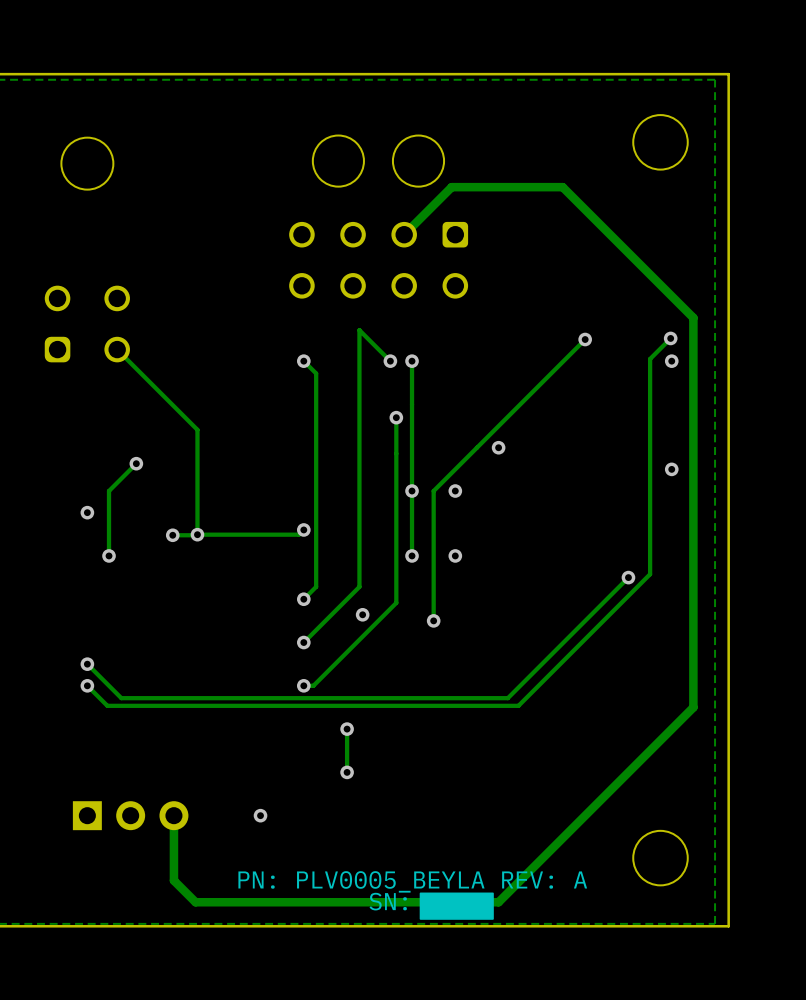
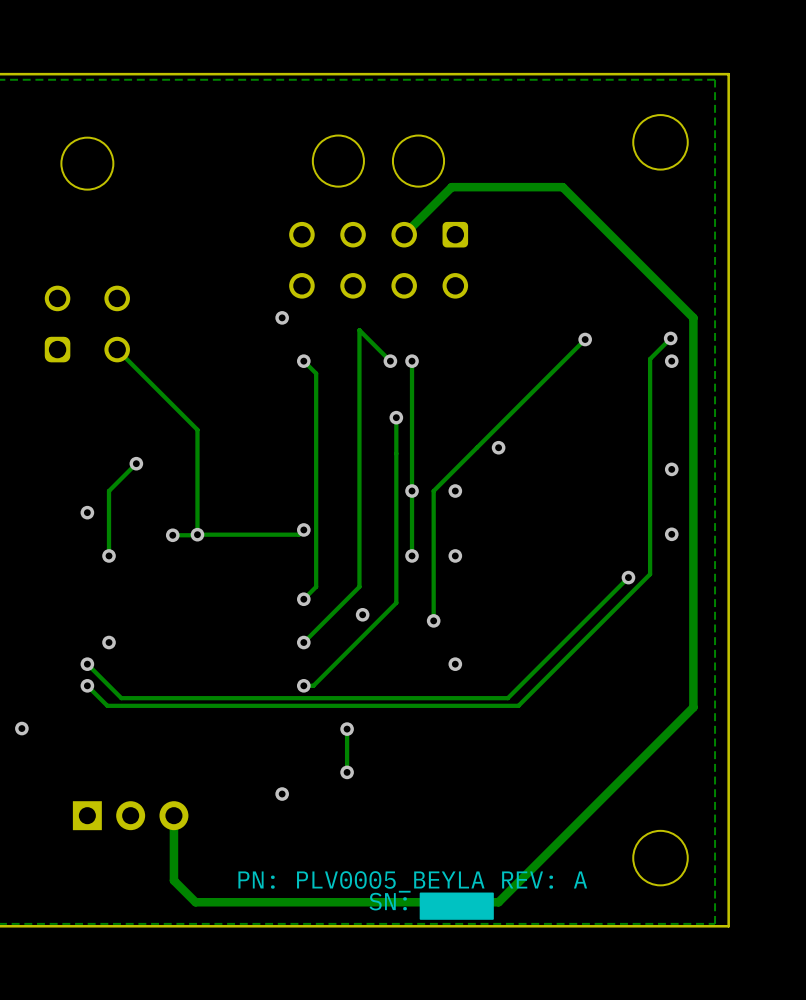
via: none -> (282, 317)
via: none -> (671, 534)
via: none -> (109, 642)
via: none -> (455, 664)
via: none -> (21, 728)
via position: (260, 815) -> (282, 794)

